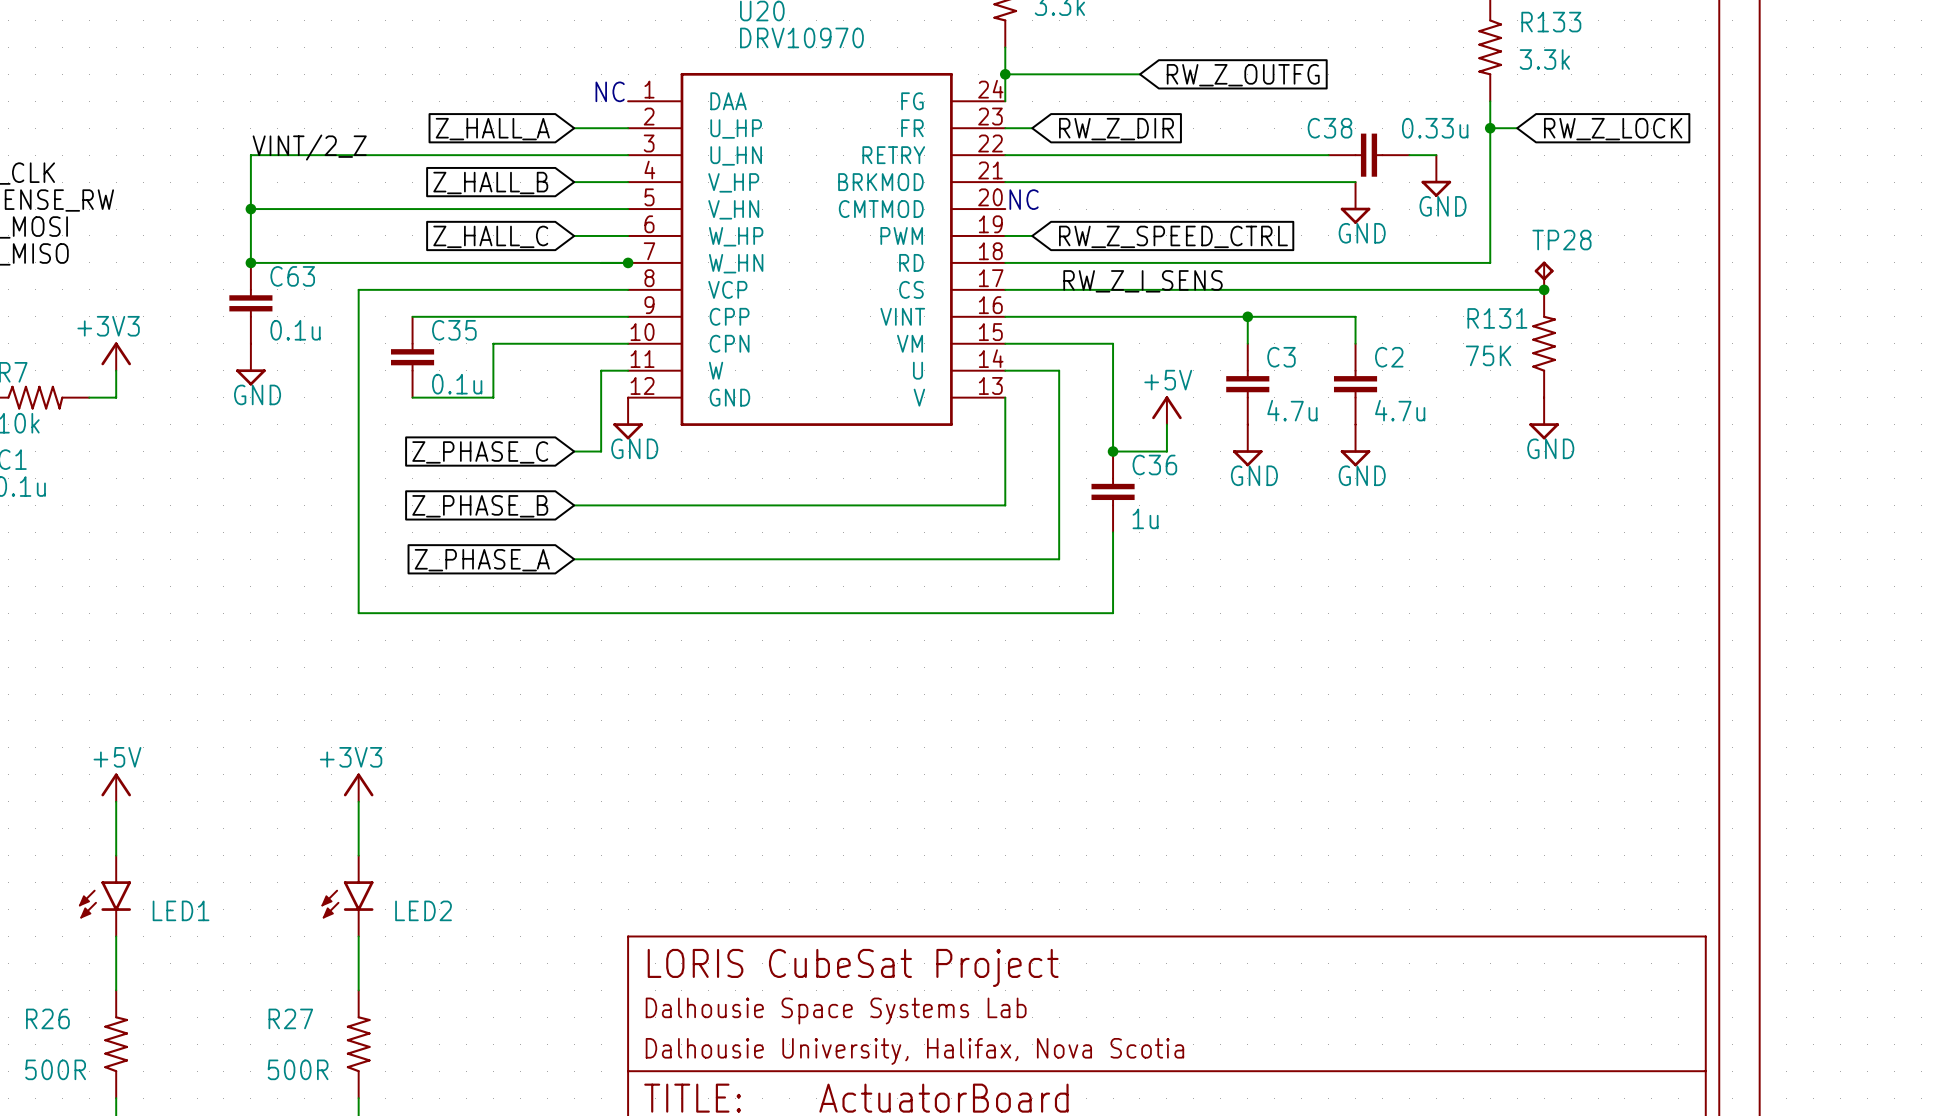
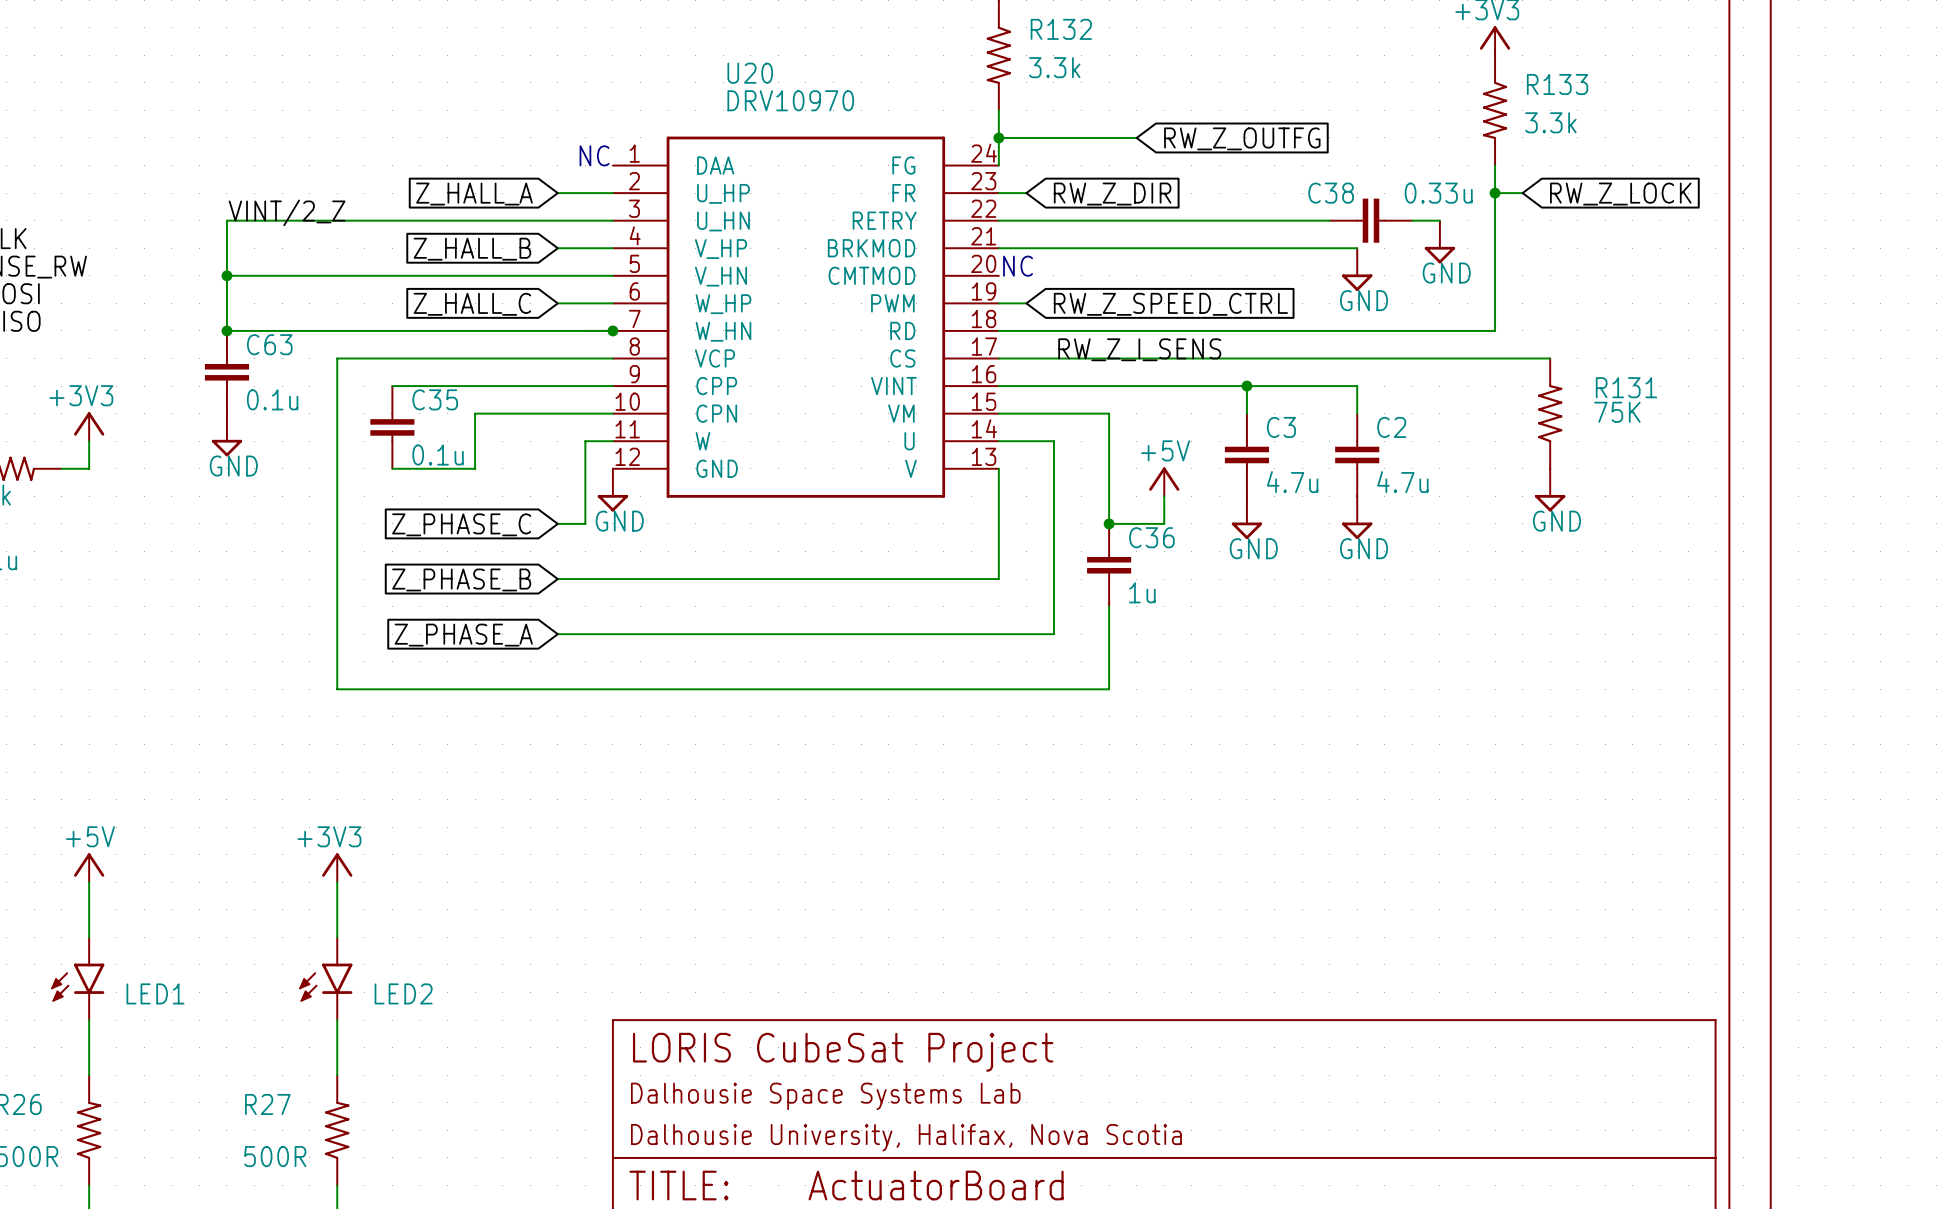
TP28: (1544, 275) -> none
junction: (1544, 289) -> none
R131 name position: R131 (1497, 318) -> R131 (1626, 387)
R131 value position: 75K (1488, 355) -> 75K (1617, 412)

